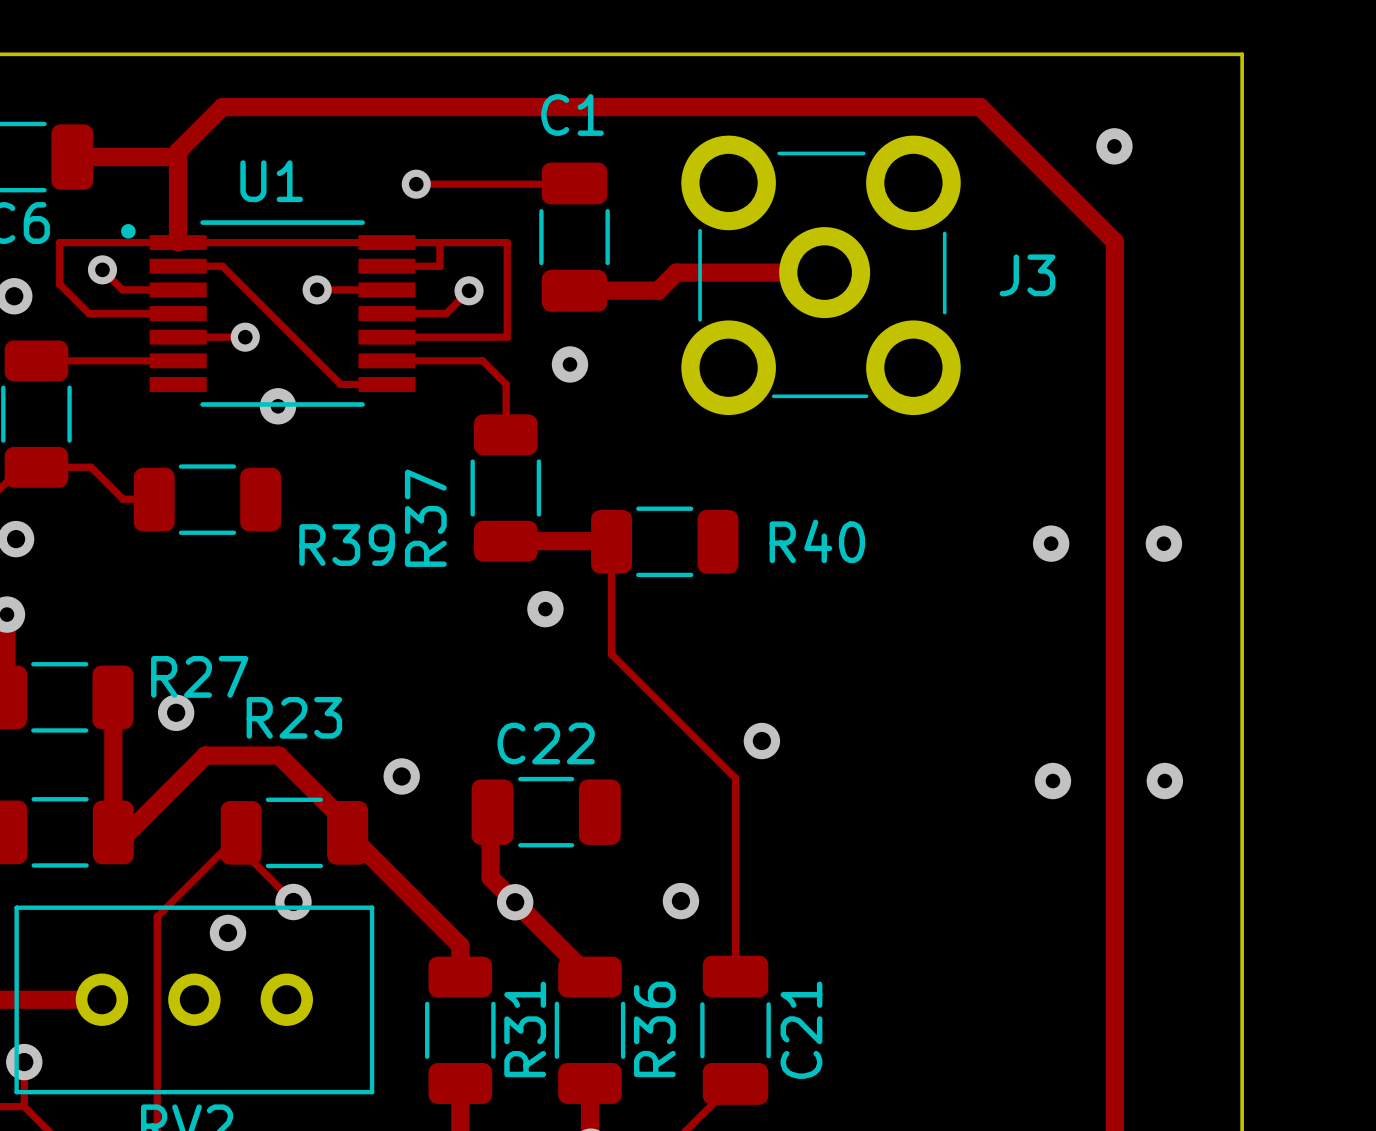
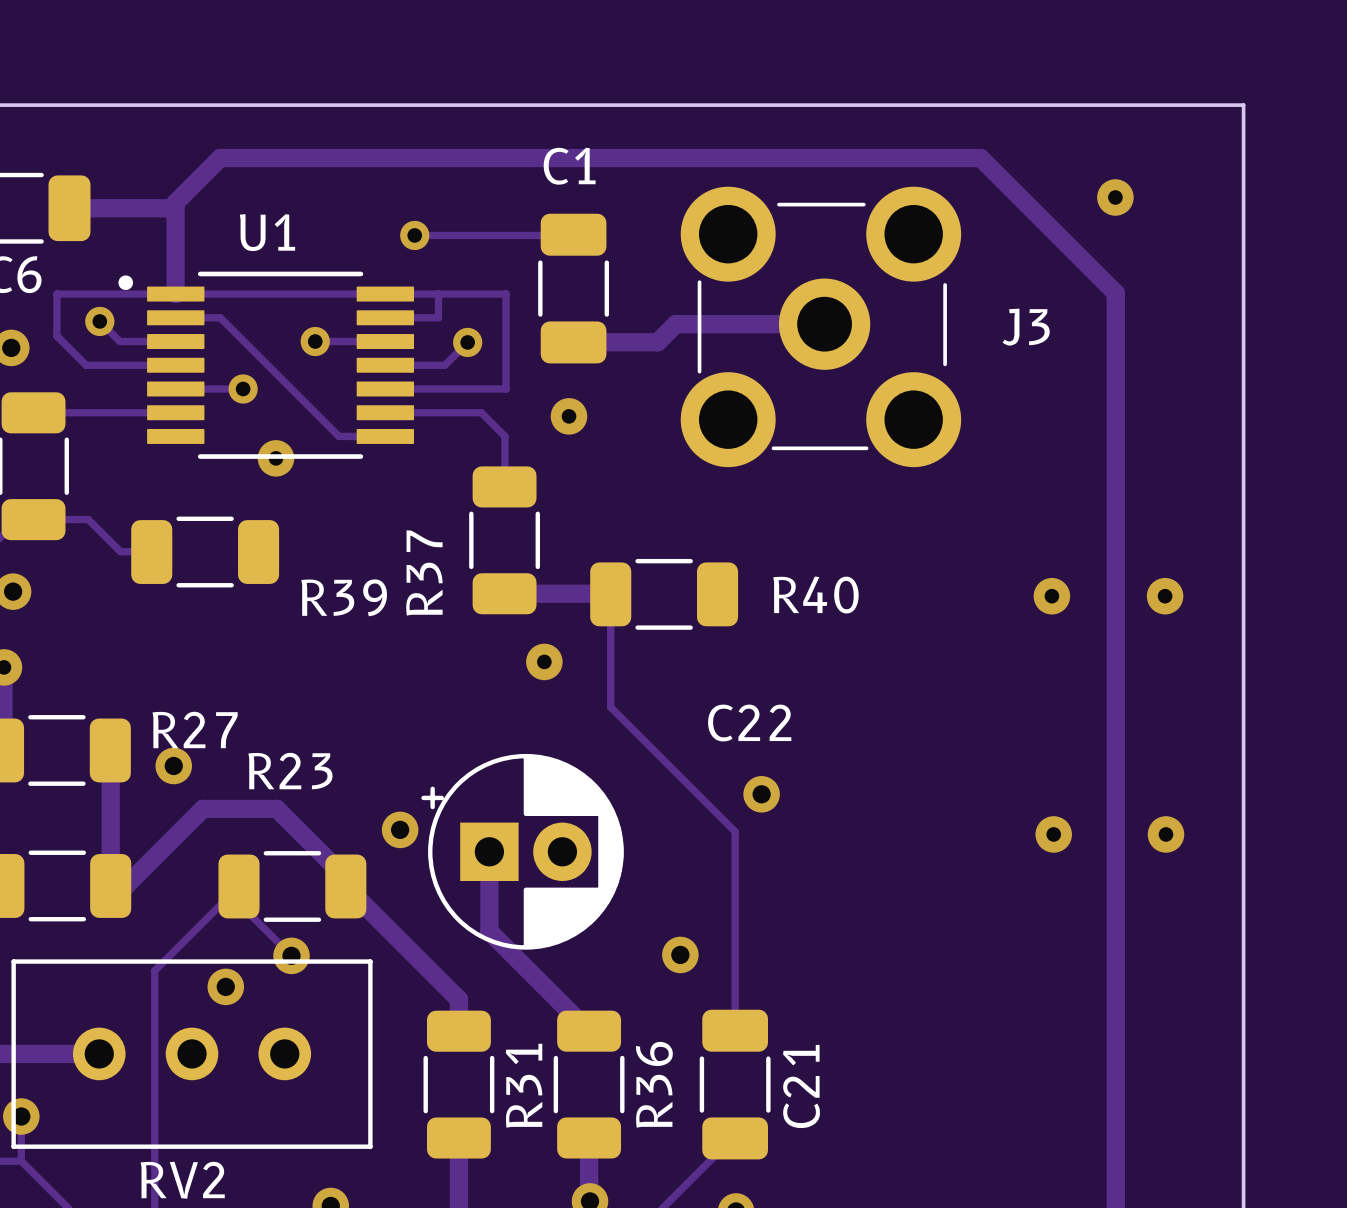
C22 name position: C22 (546, 743) -> C22 (749, 723)
C22 footprint: [471, 776, 621, 848] -> [421, 753, 624, 950]
via: (515, 902) -> none

